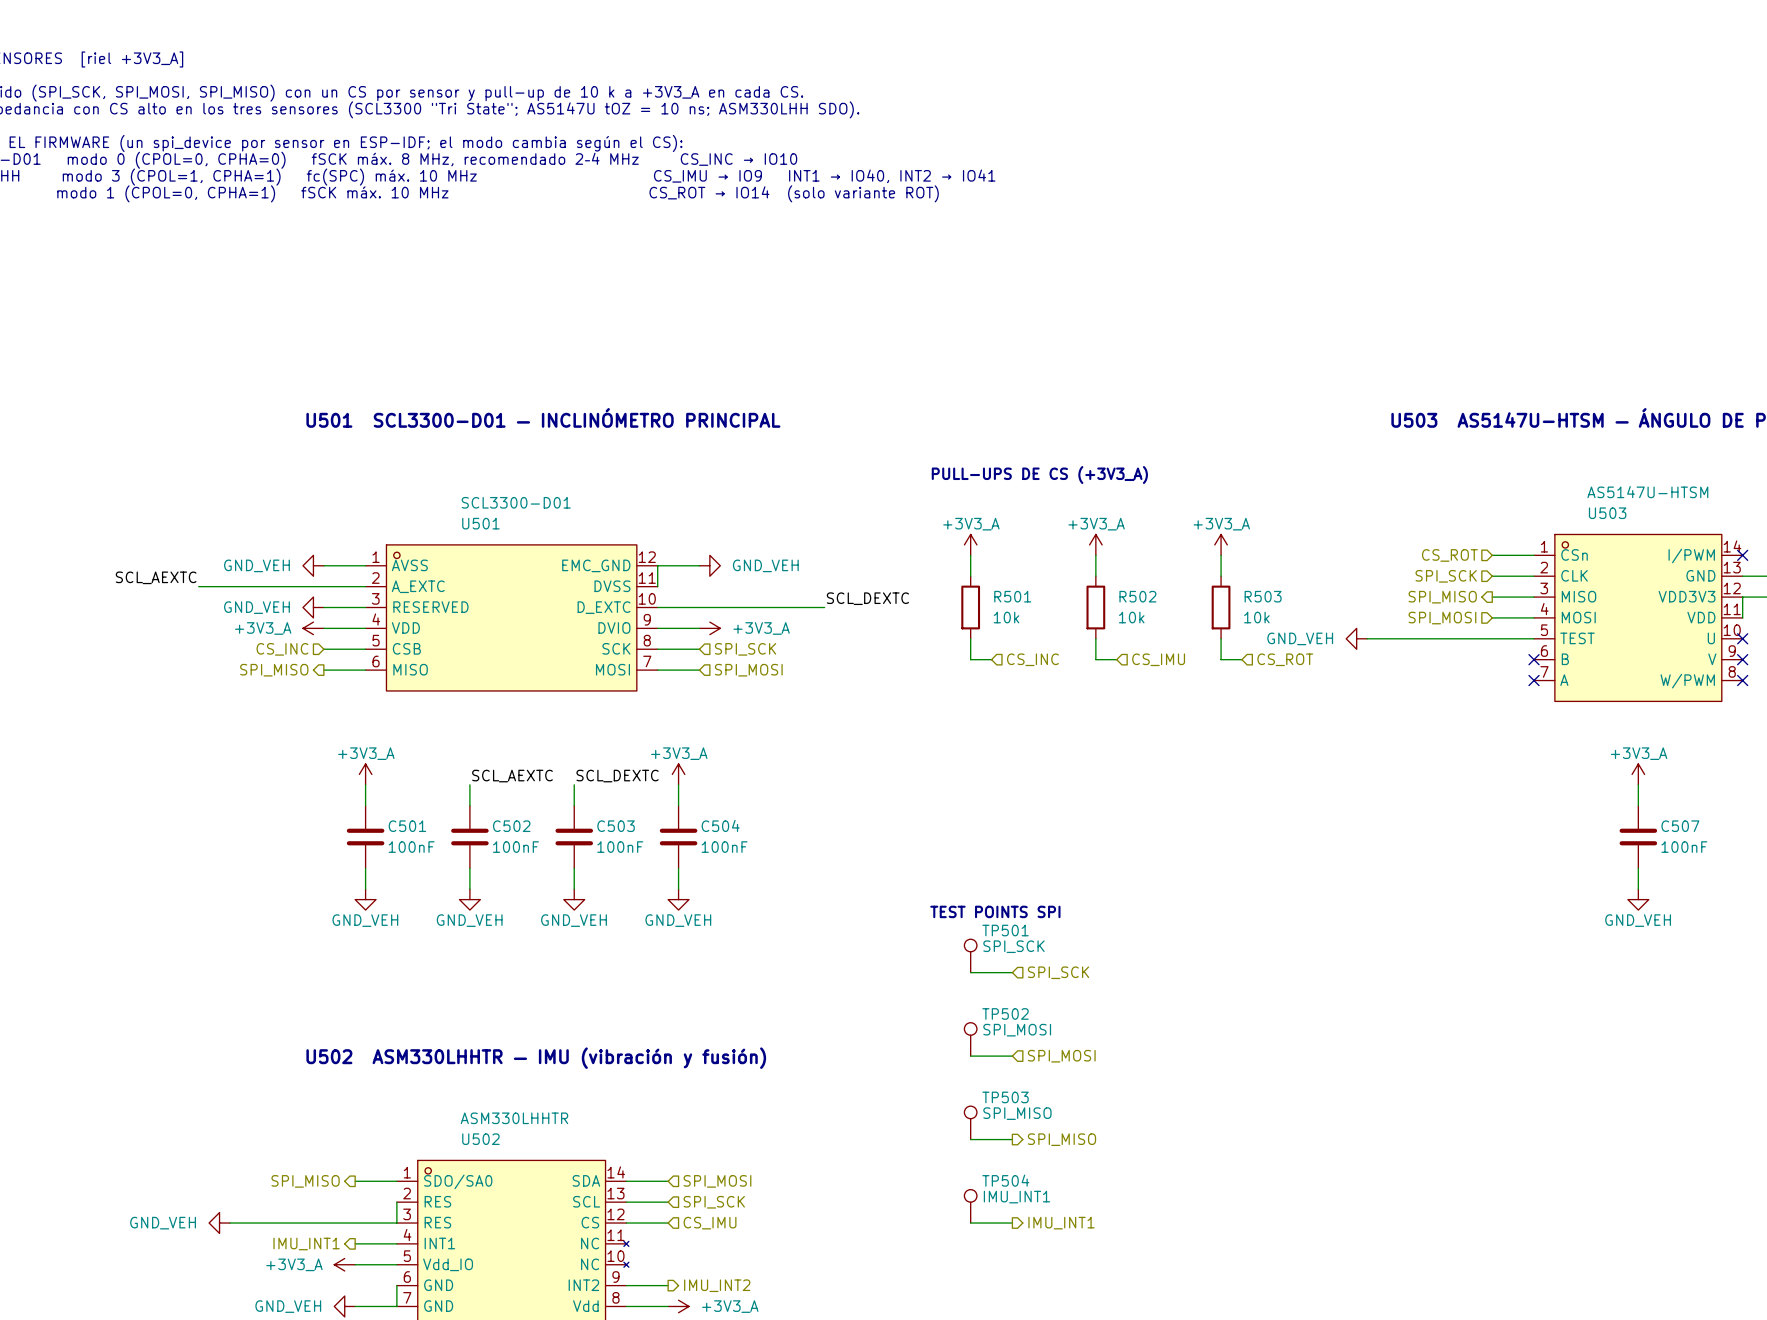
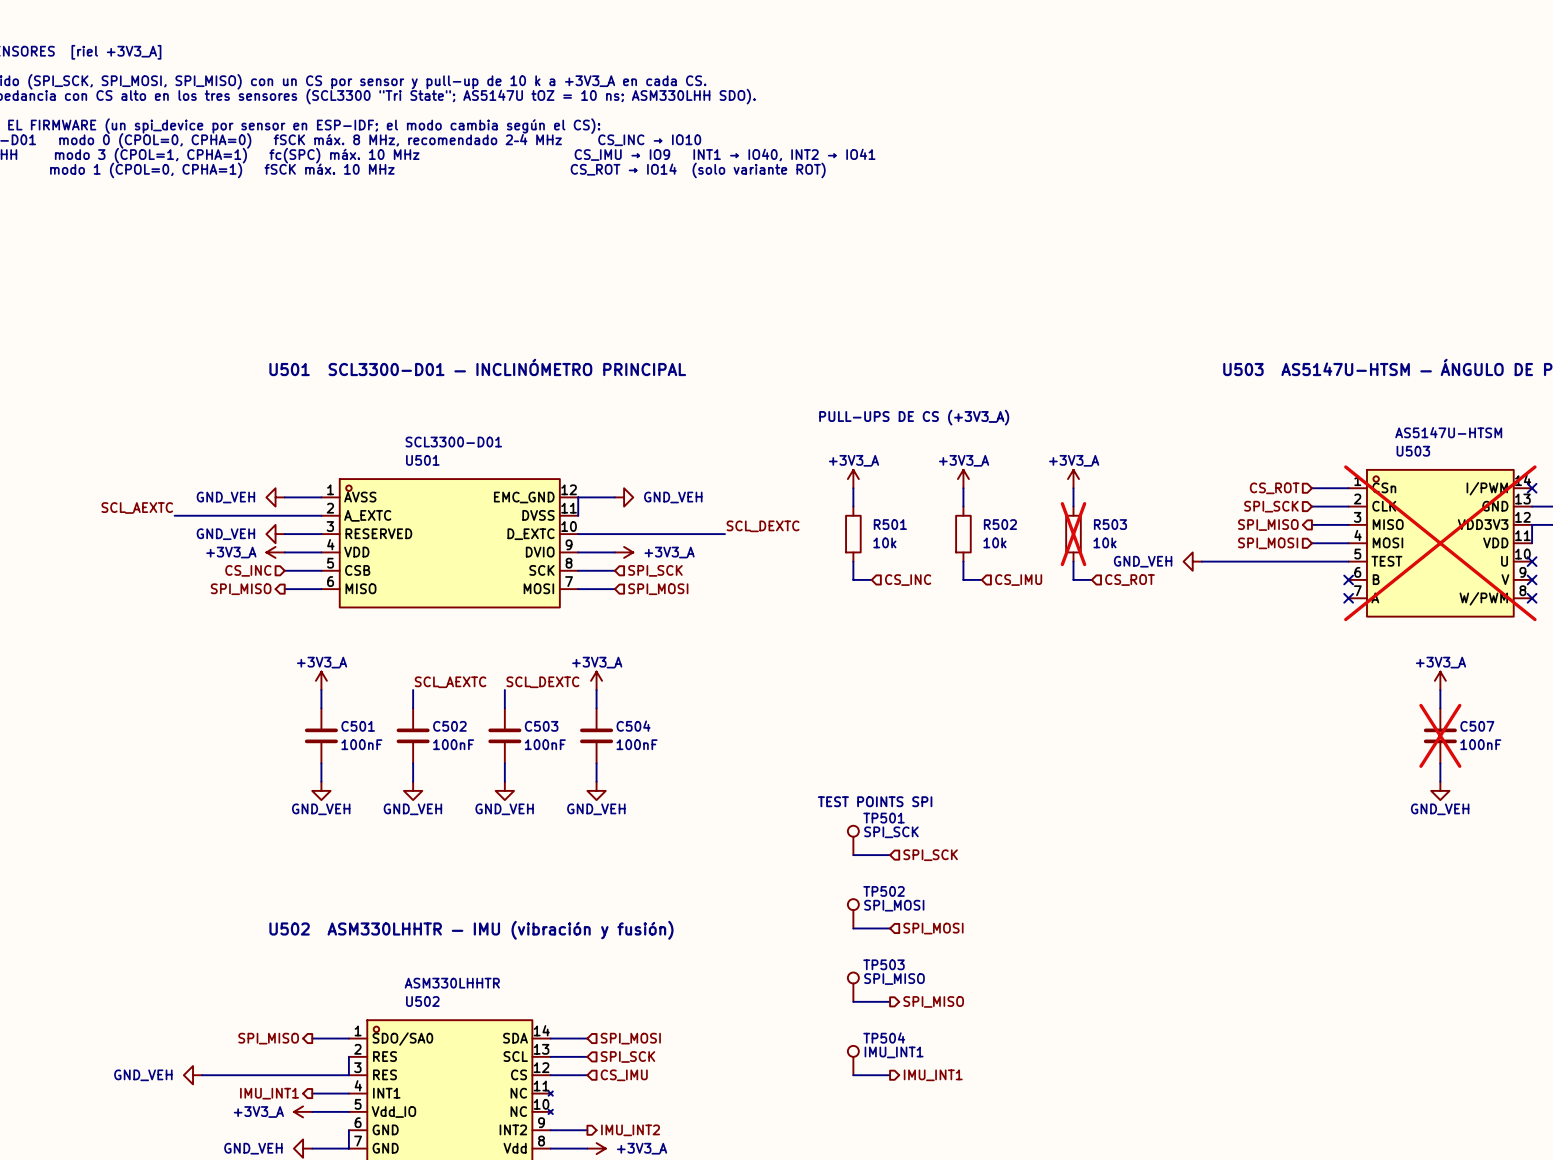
R503 do-not-place cross: none -> (1073, 534)
U503 do-not-place cross: none -> (1440, 543)
C507 do-not-place cross: none -> (1440, 735)

